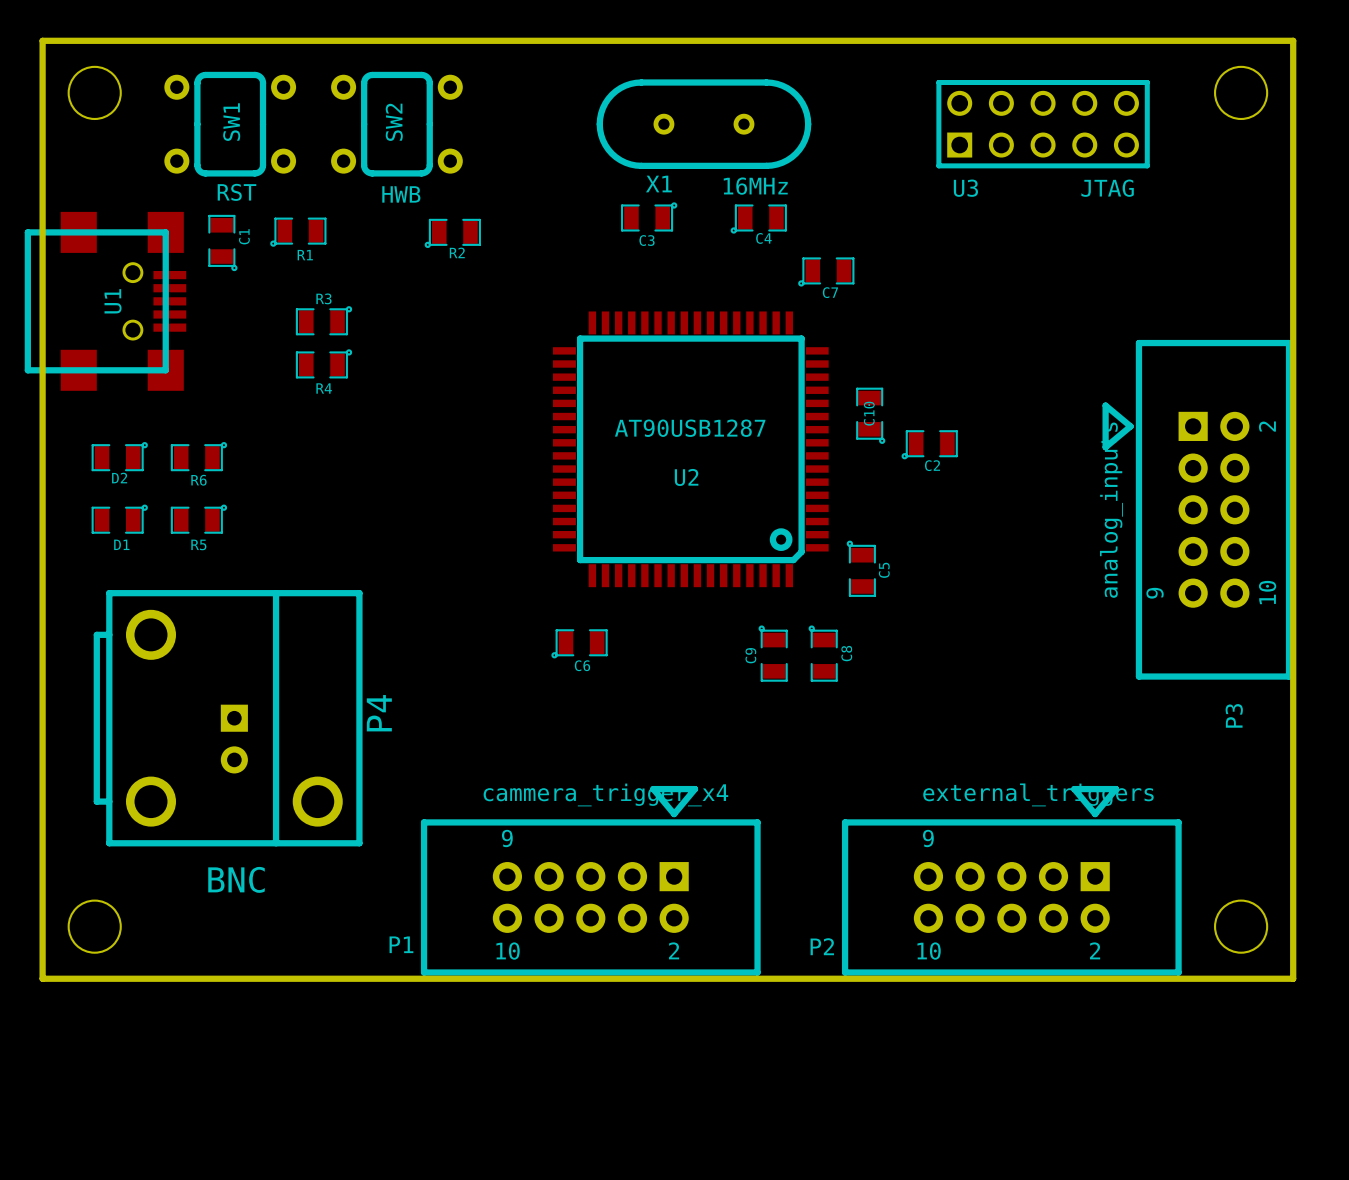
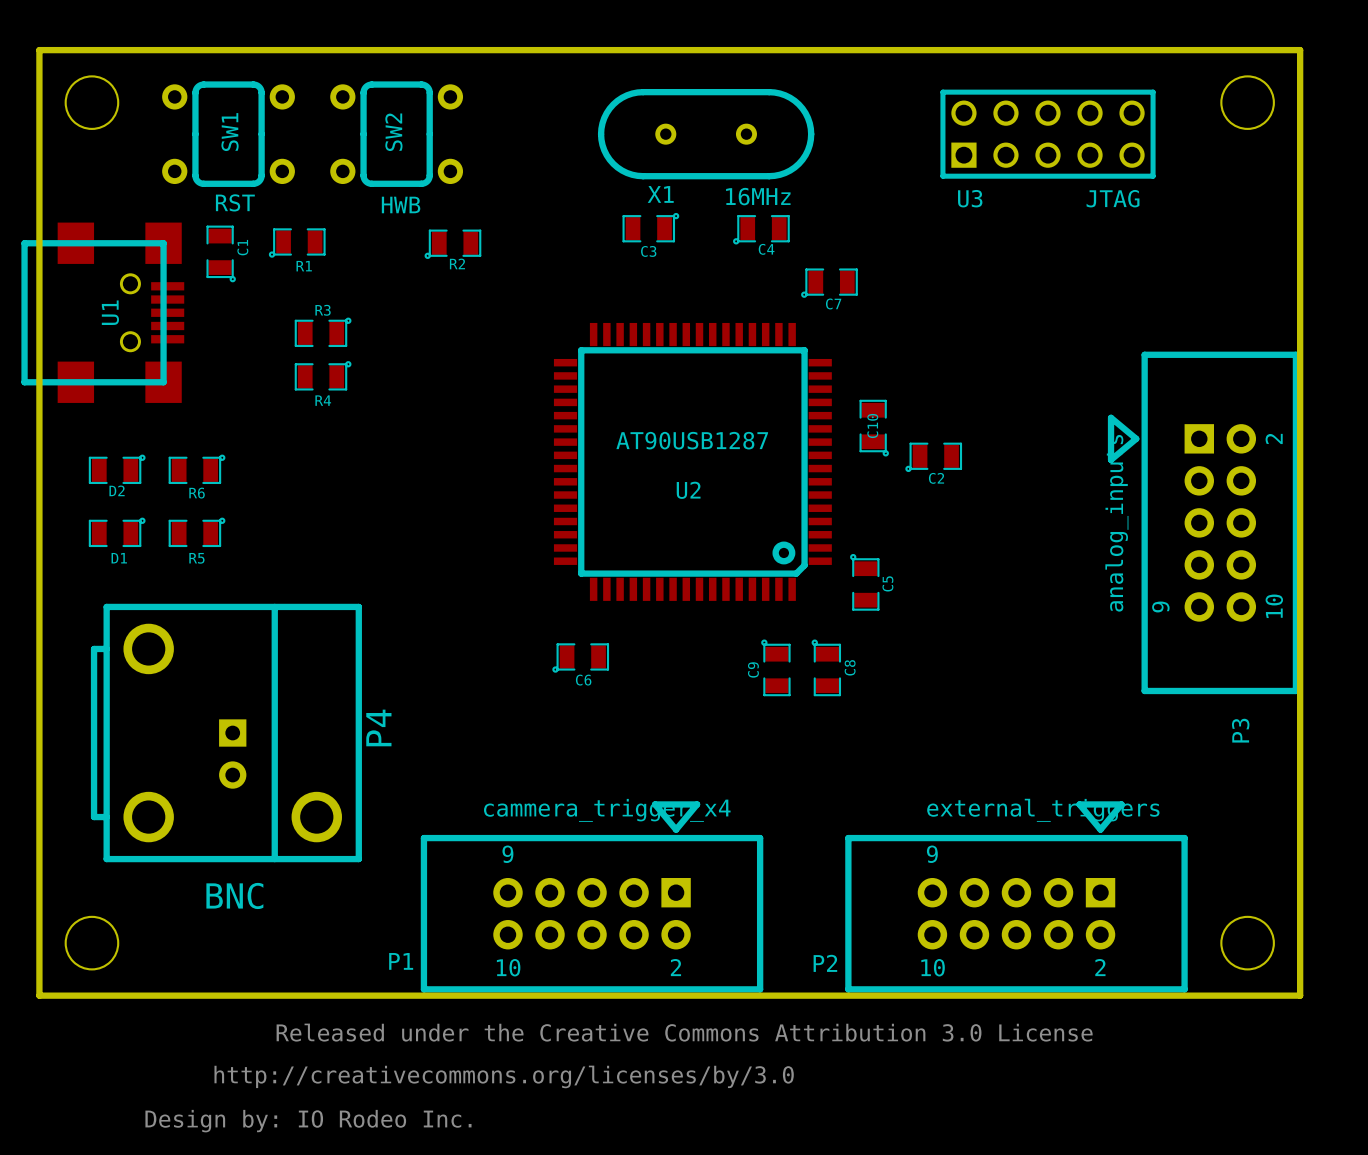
text: none -> Released under the Creative Commons Attribution 3.0 License (684, 1032)
text: none -> http://creativecommons.org/licenses/by/3.0 (504, 1076)
text: none -> Design by: IO Rodeo Inc. (308, 1121)

